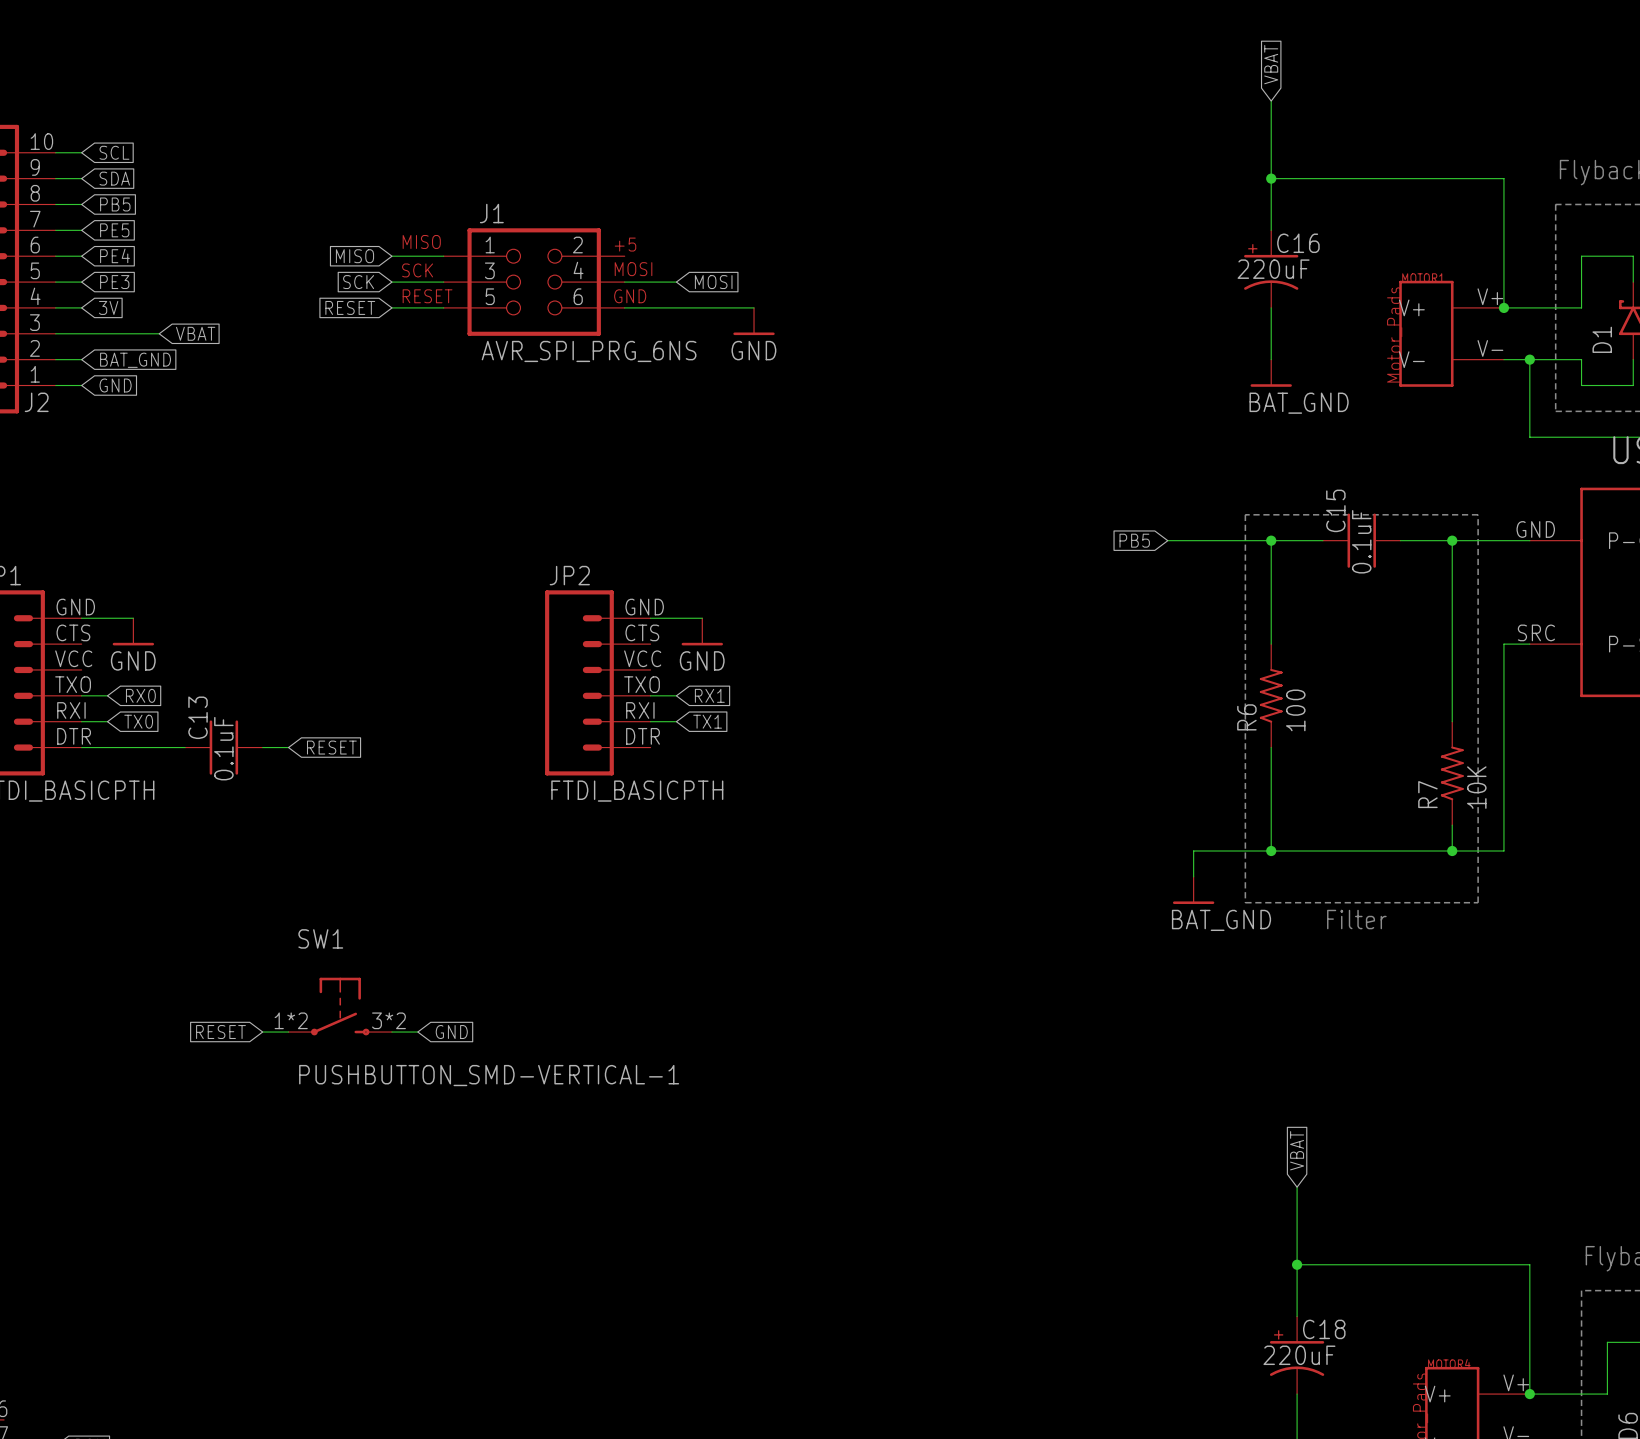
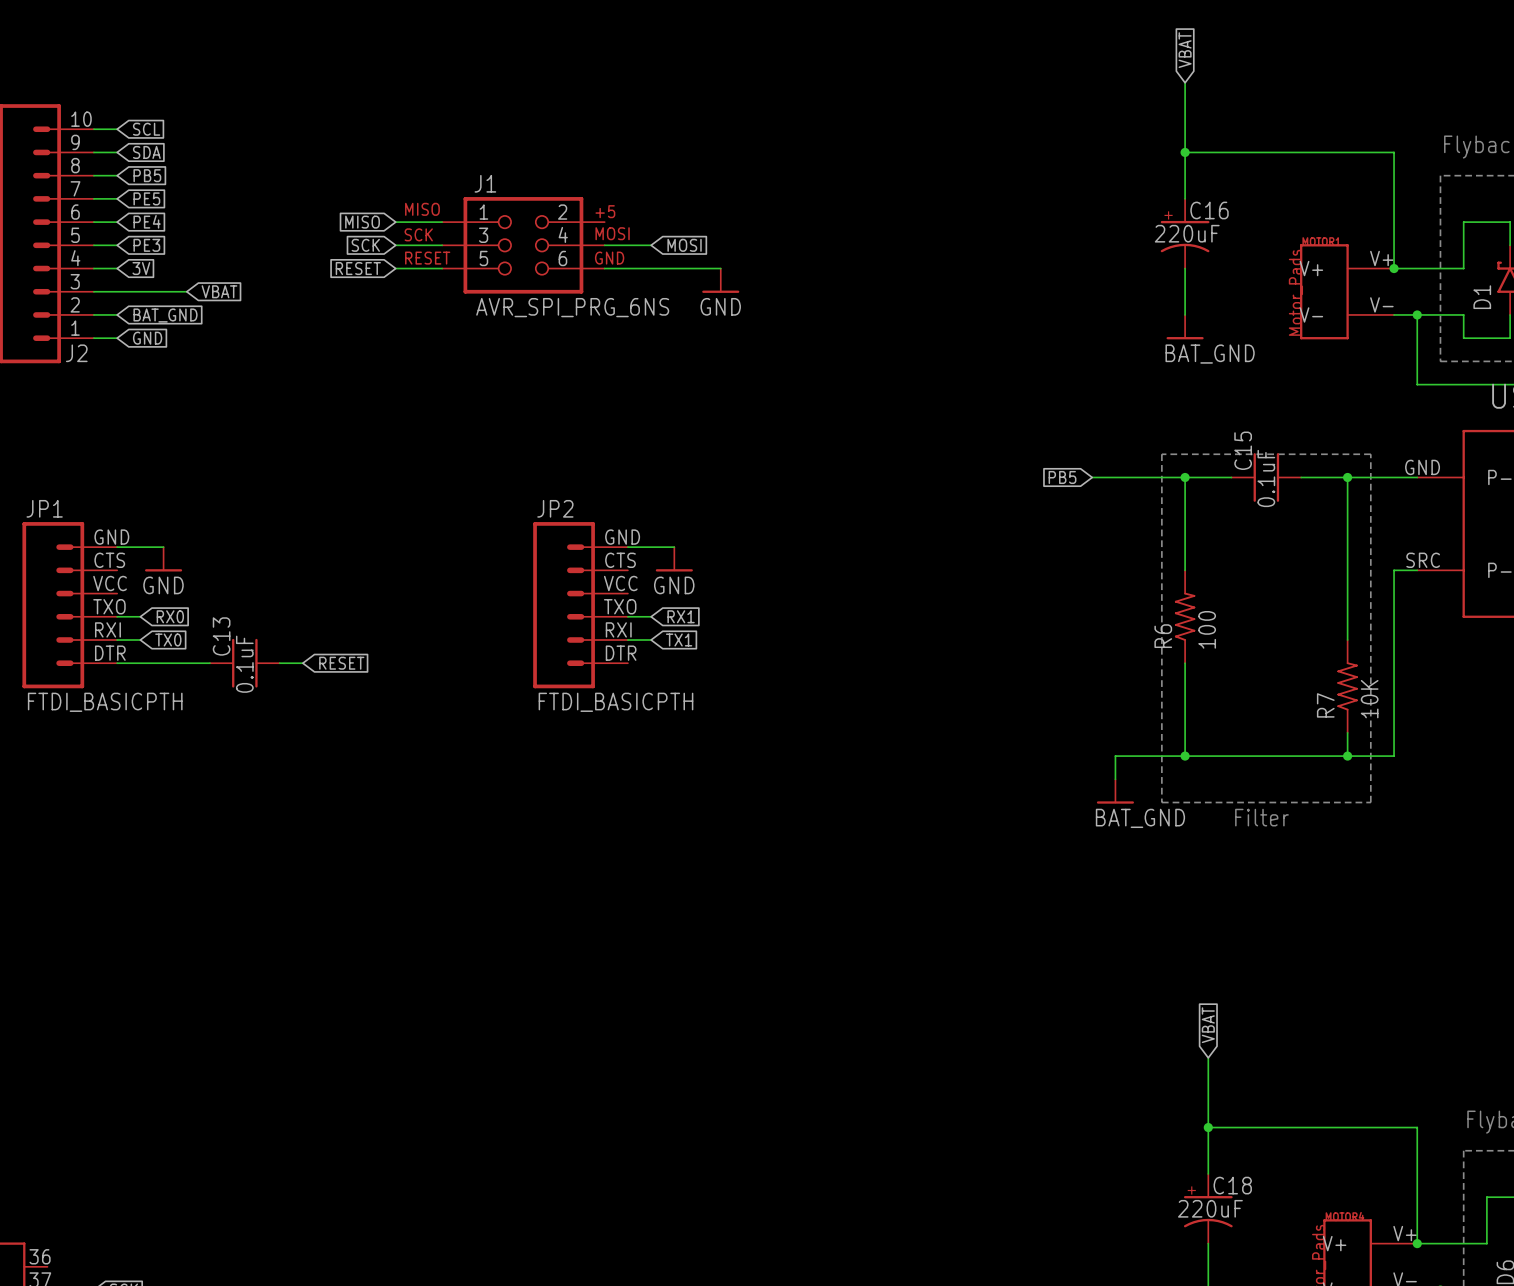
SW1: PUSHBUTTON_SMD-VERTICAL-1 (340, 1006) -> none
global label: RESET (220, 1032) -> none
wire: (262, 1032) (288, 1032) -> none
wire: (391, 1032) (417, 1032) -> none
global label: GND (451, 1032) -> none

